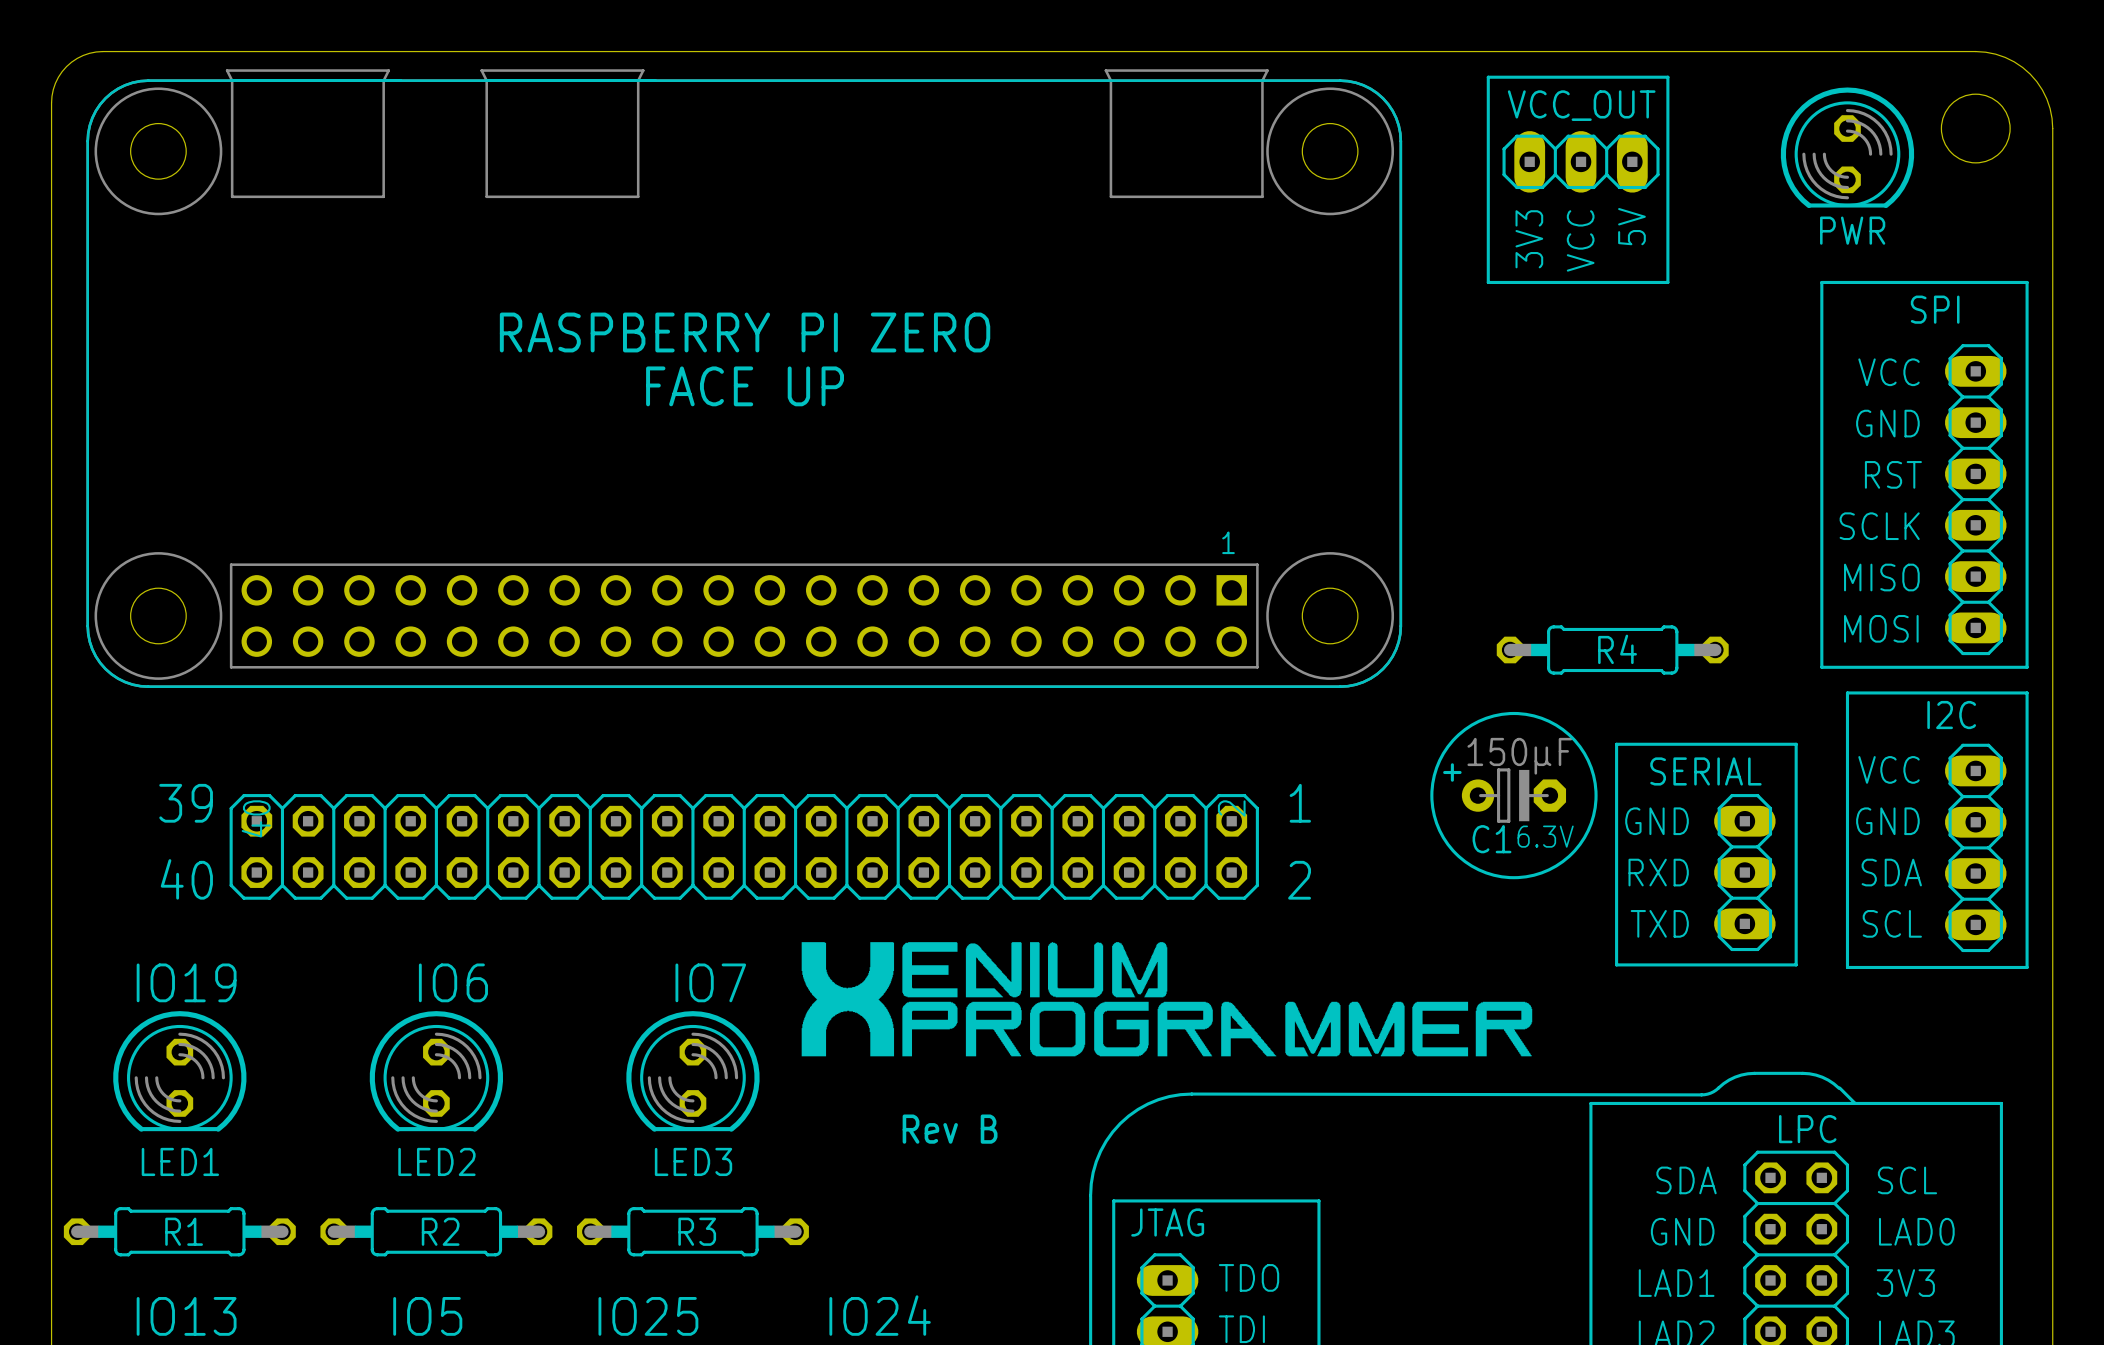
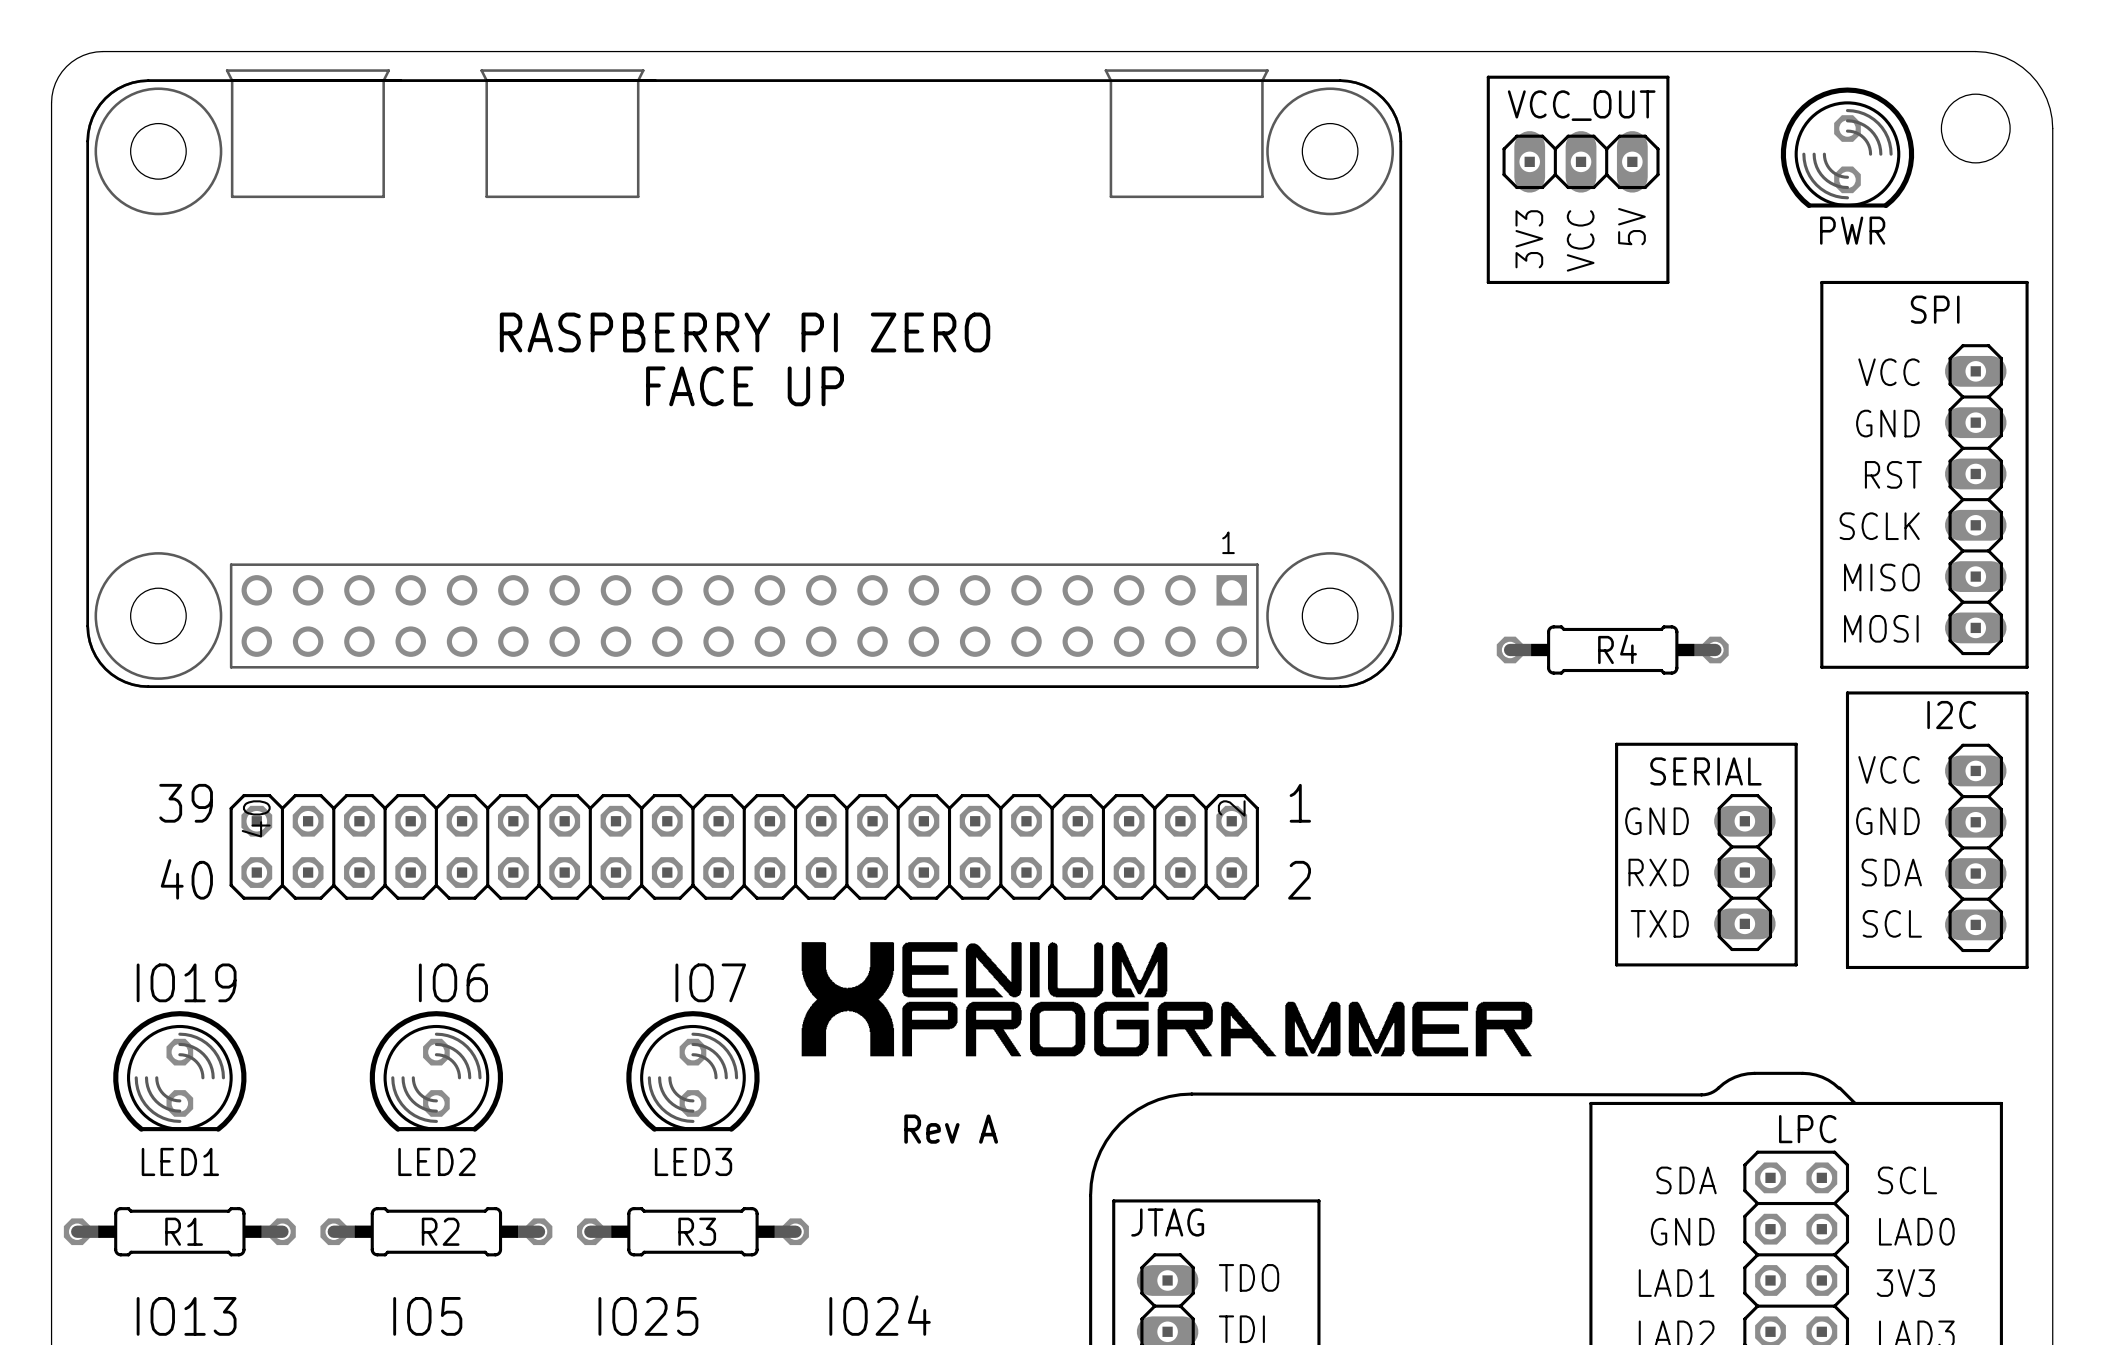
C1: 150µF (1513, 795) -> none
text: 6.3V (1545, 836) -> none
text: Rev B (950, 1129) -> Rev A (951, 1129)

